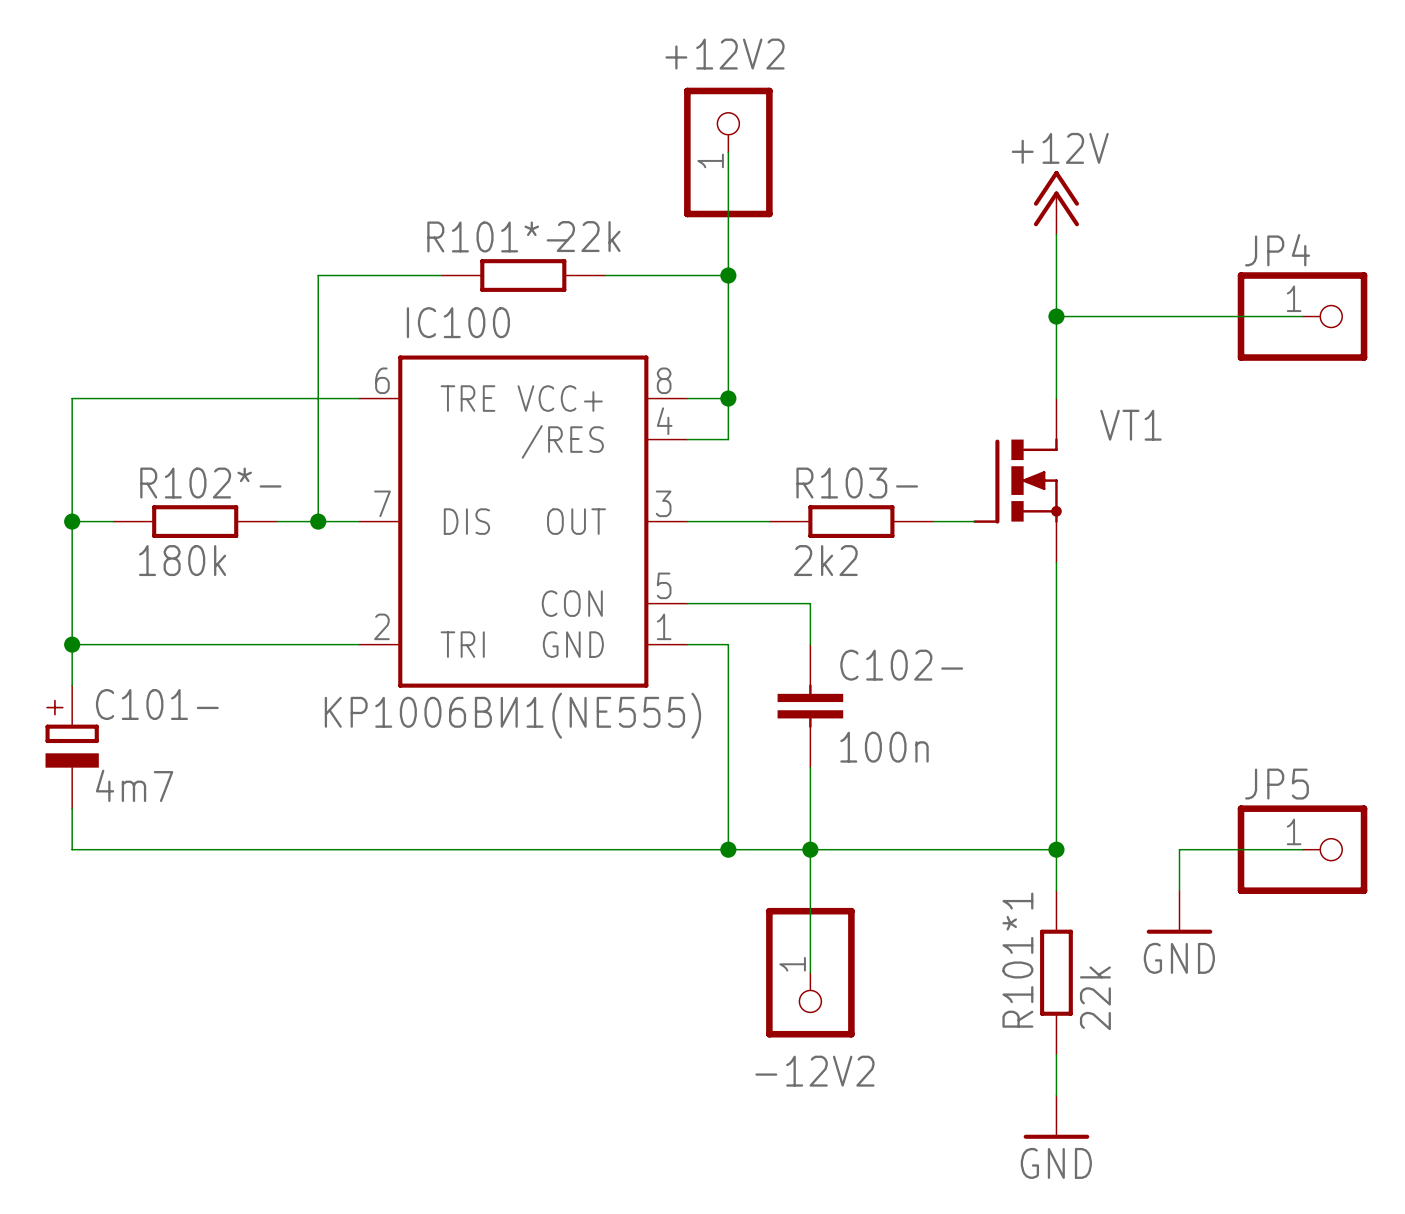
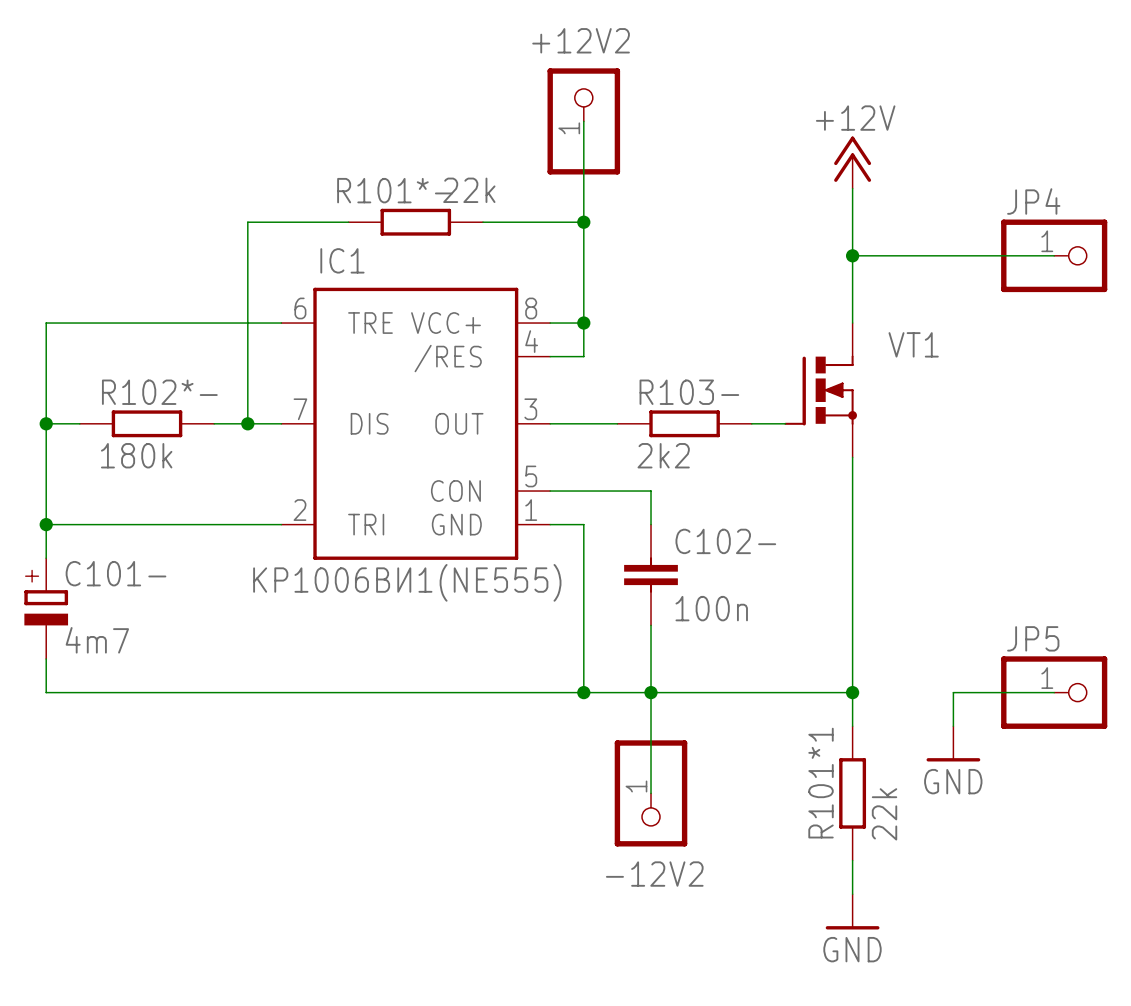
IC100 name: IC100 (458, 322) -> IC1 (342, 260)

